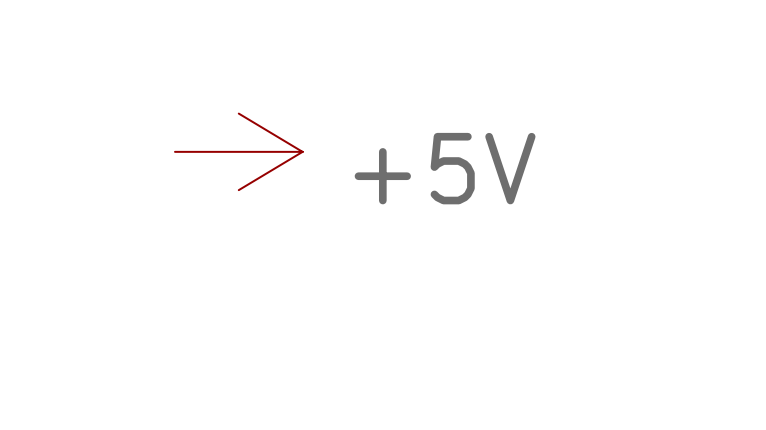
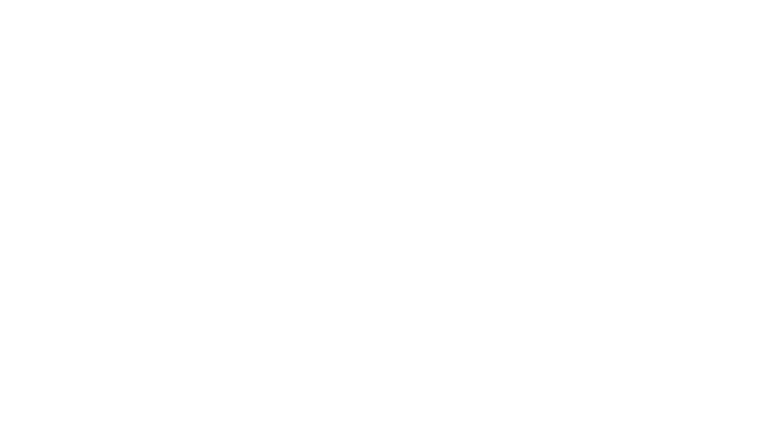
power symbol: +5V (238, 151) -> none

